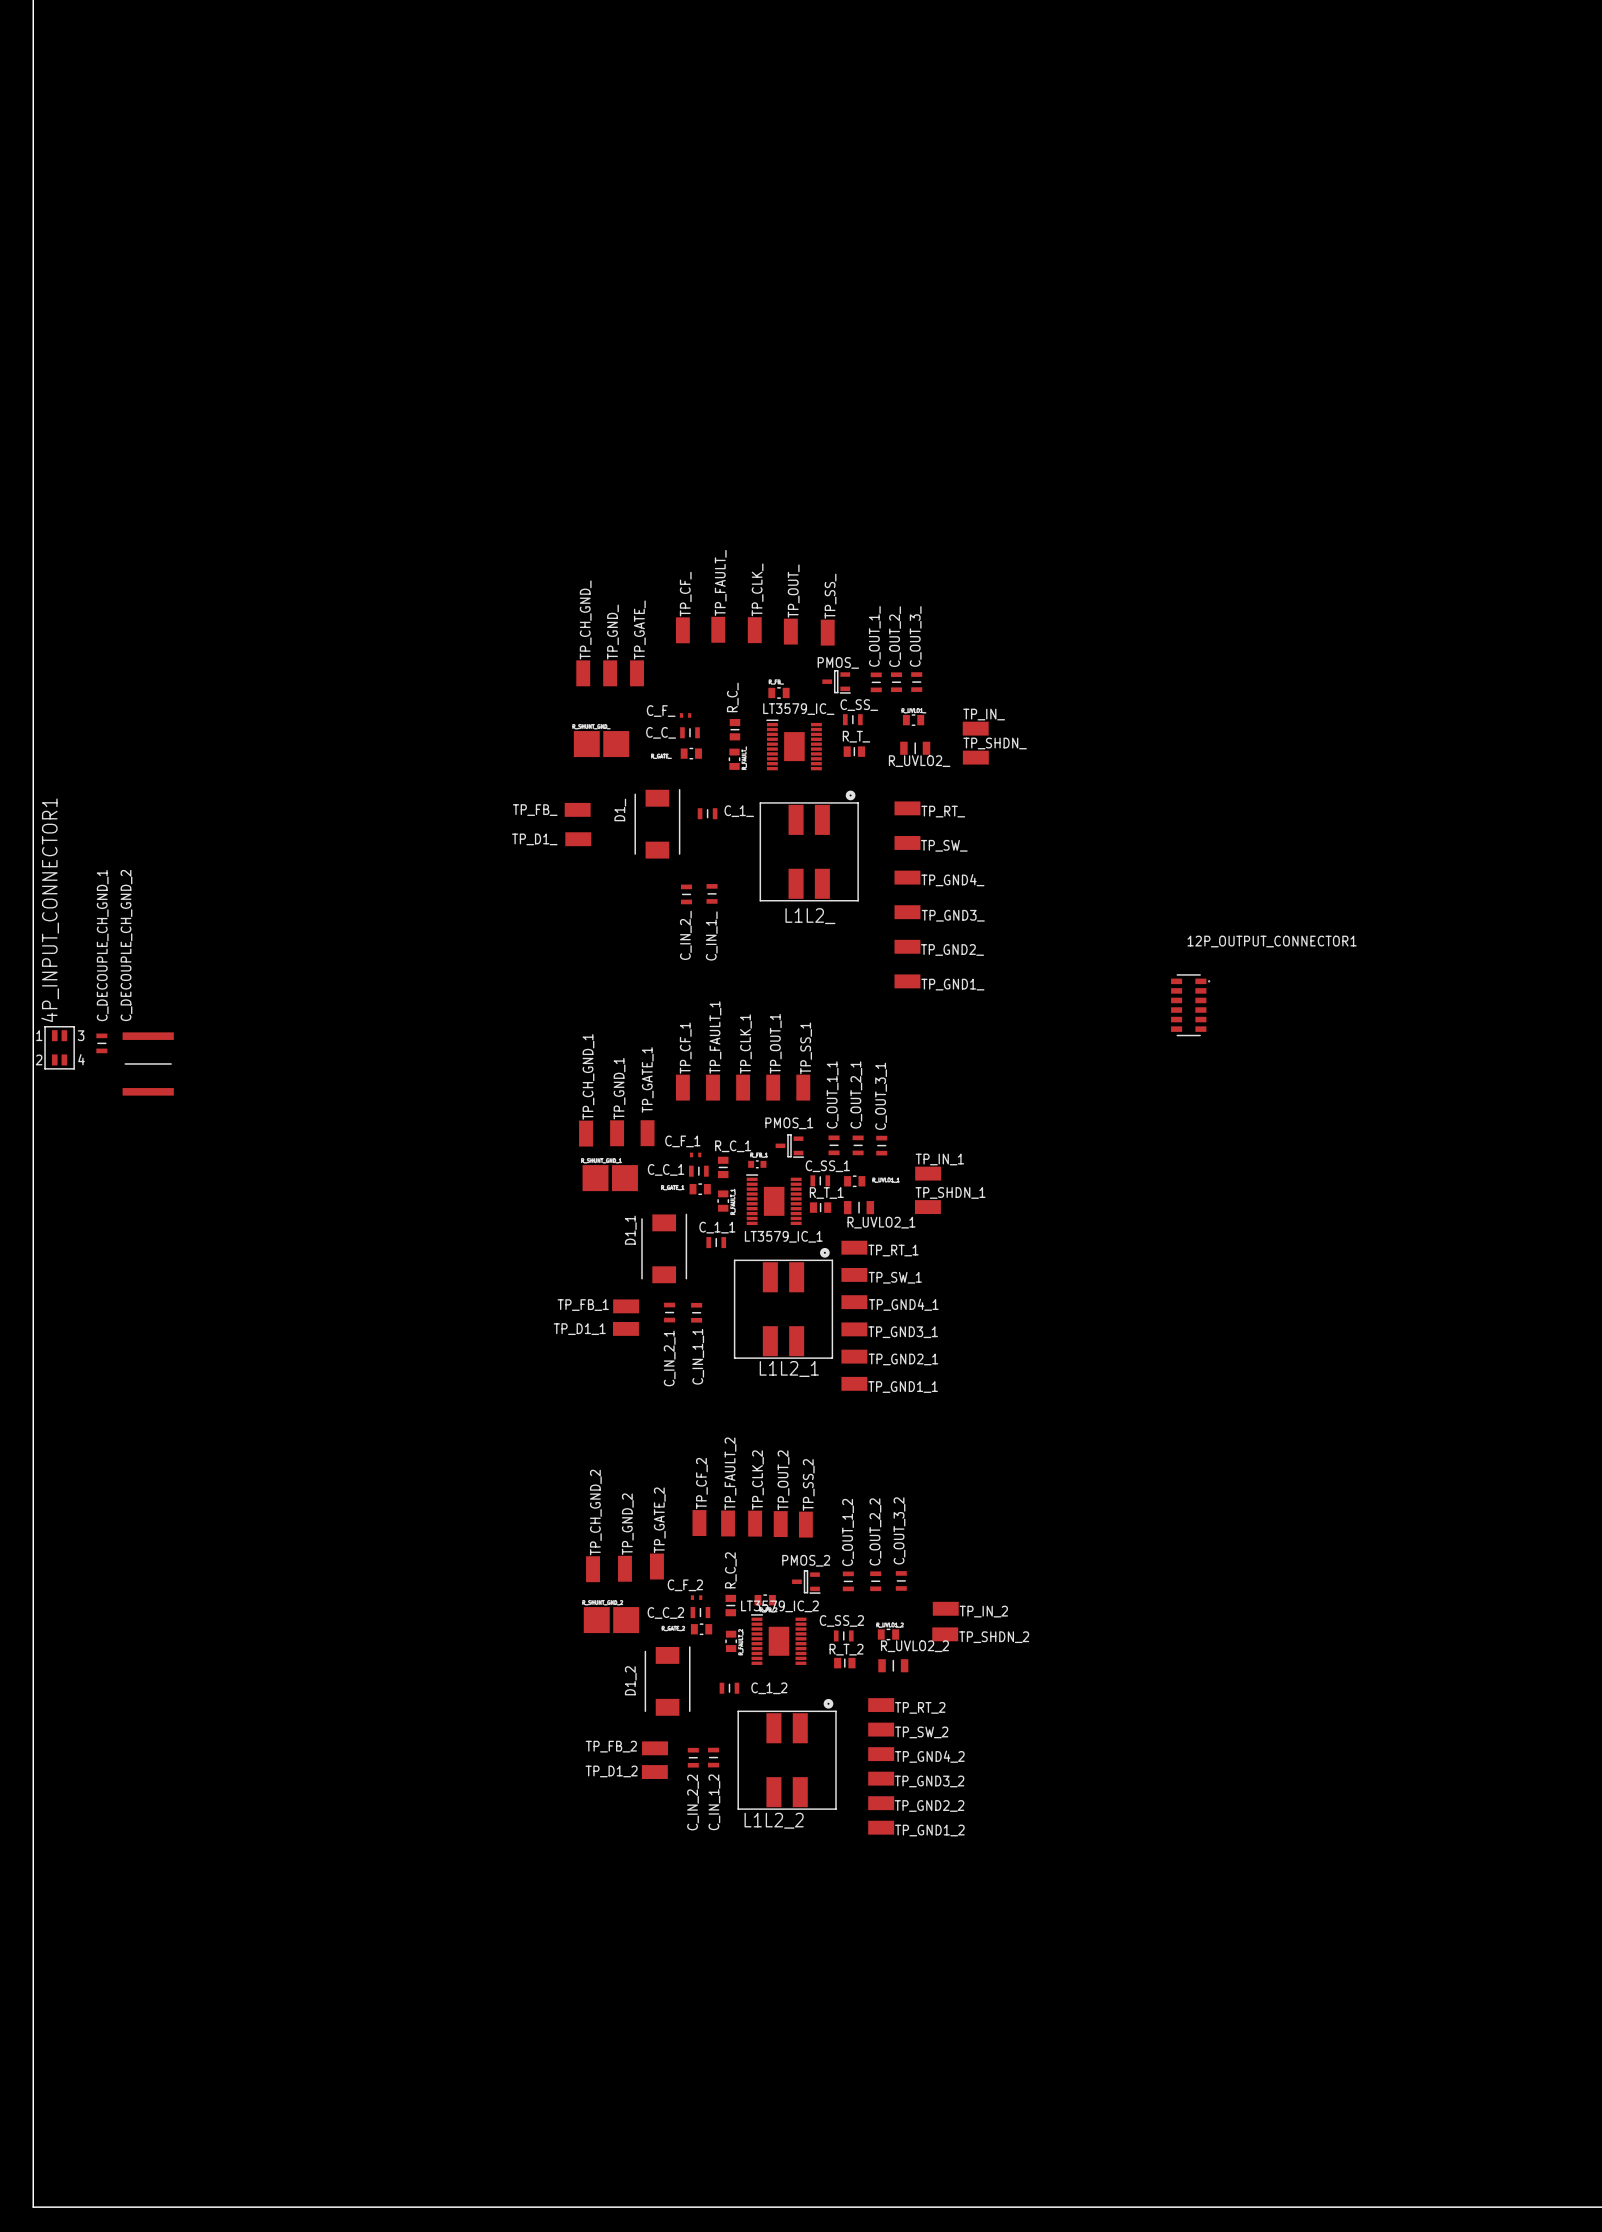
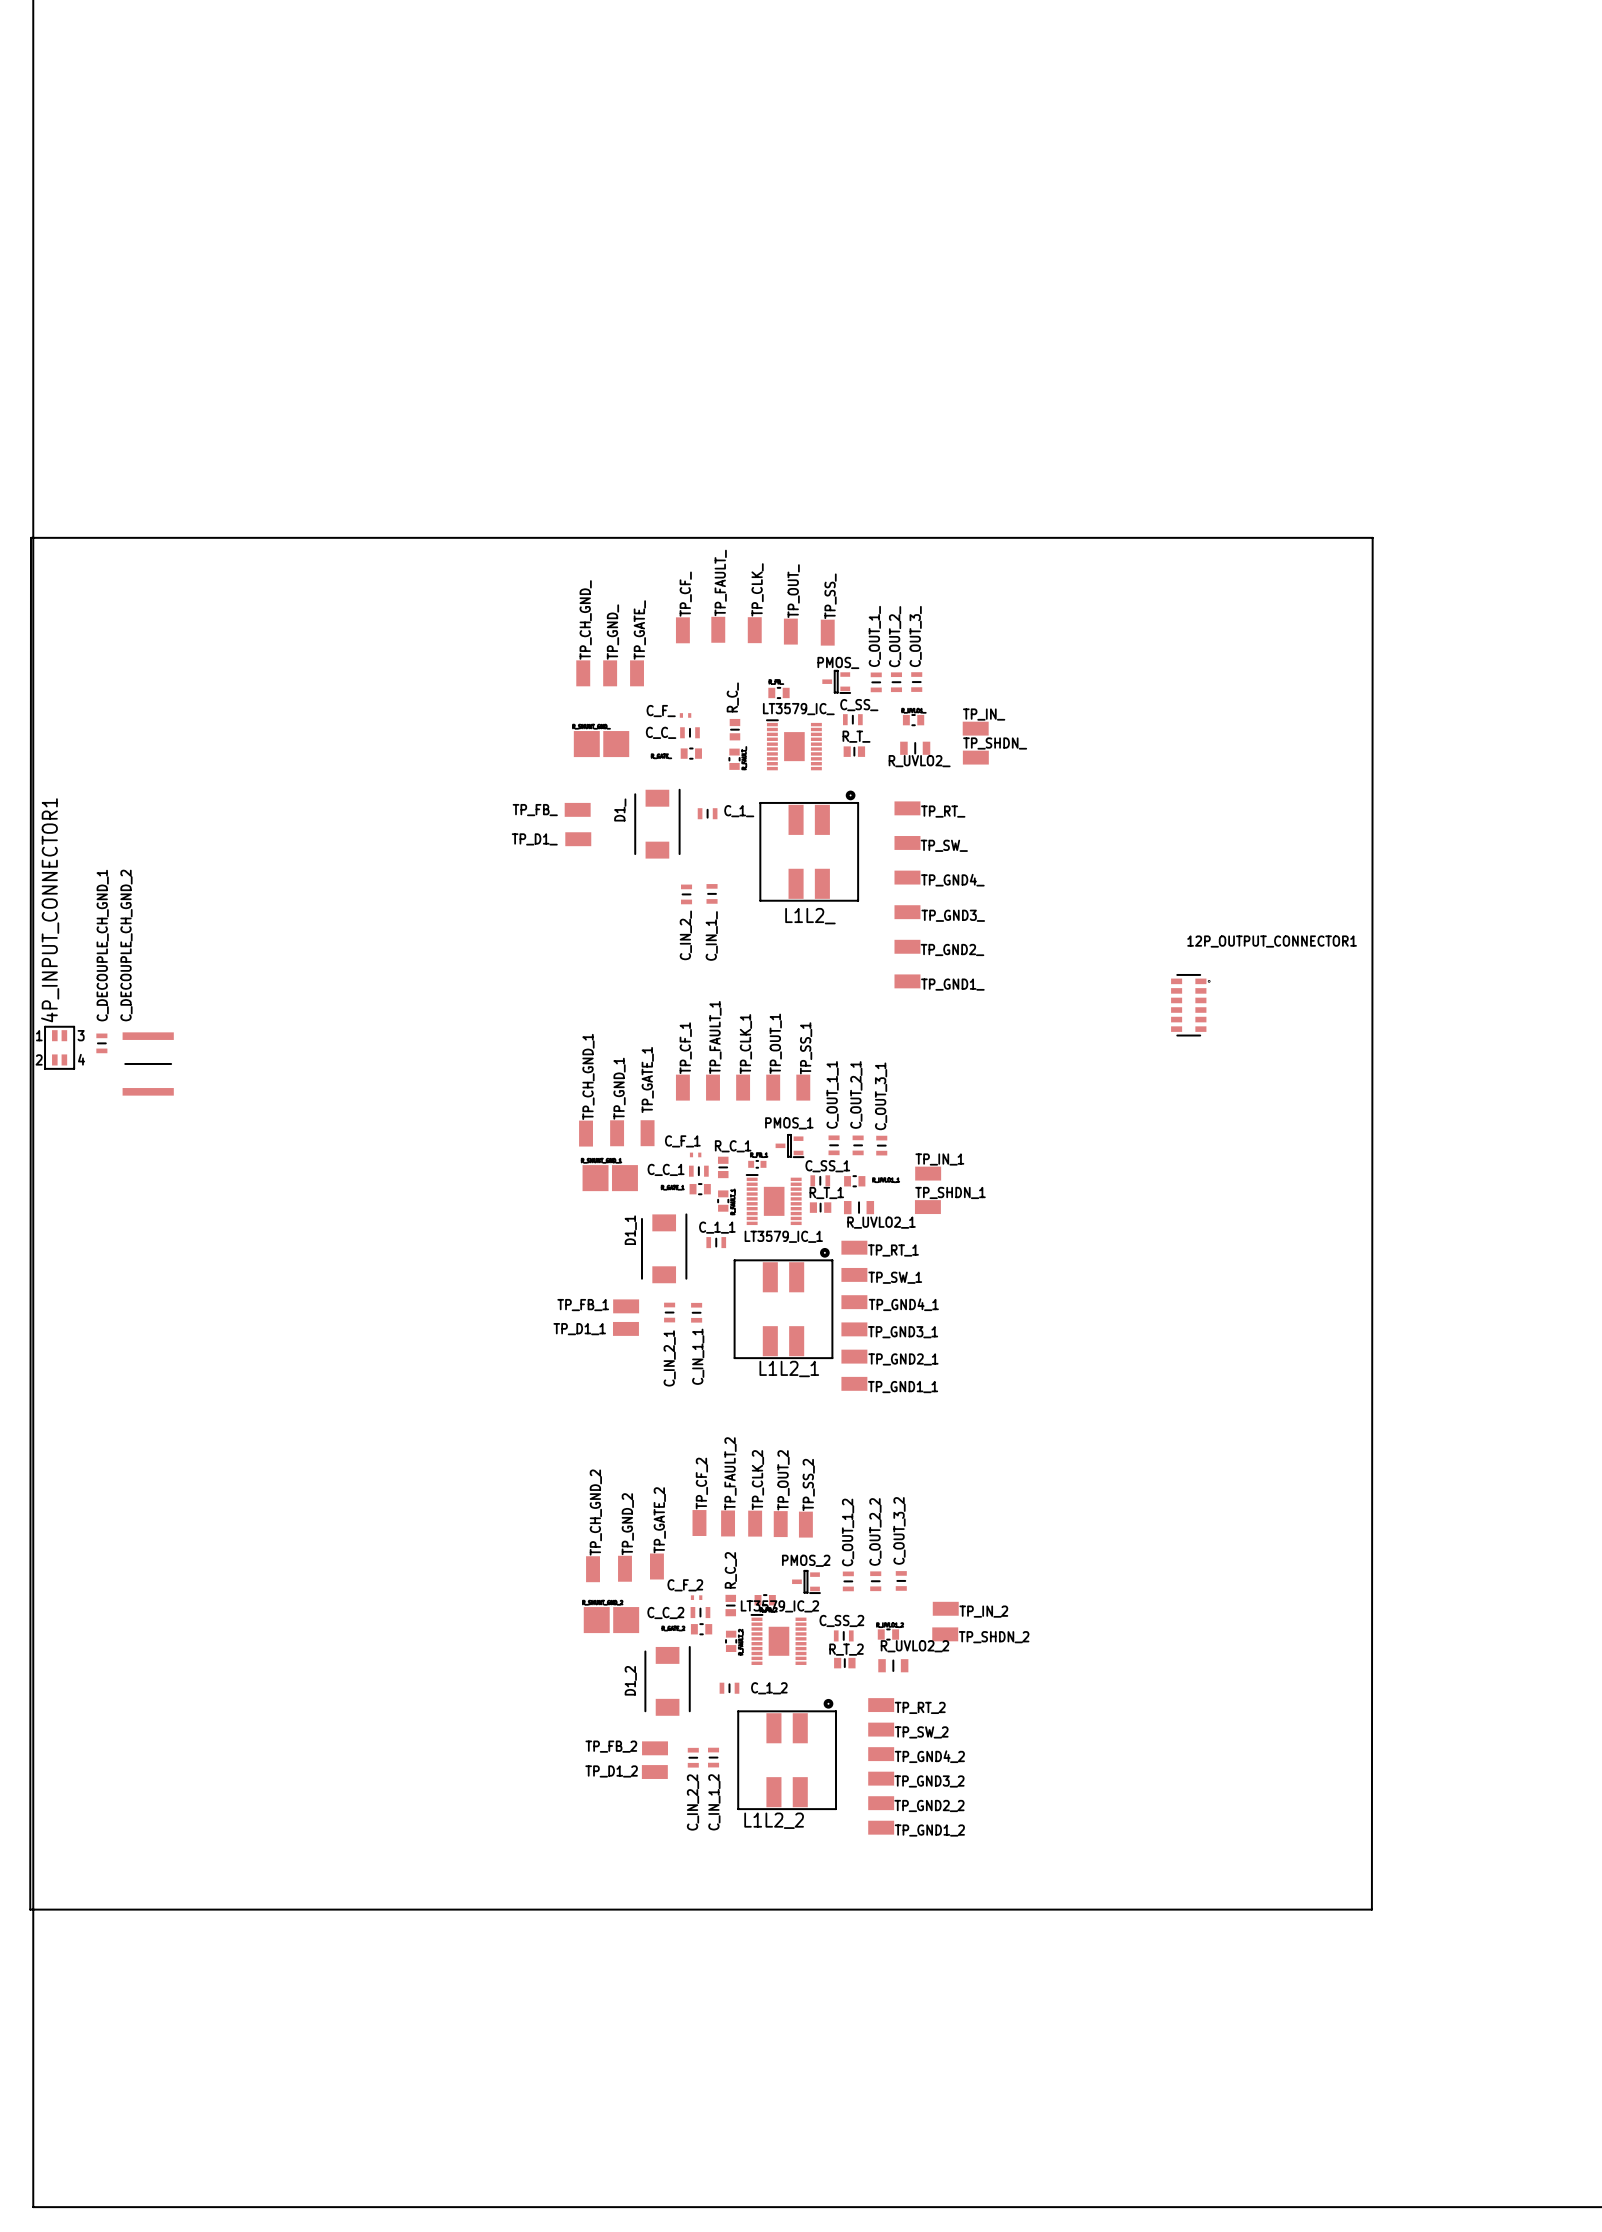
board edge: none -> (31, 537) (30, 1909) (1371, 1909) (1372, 537) (31, 537)

